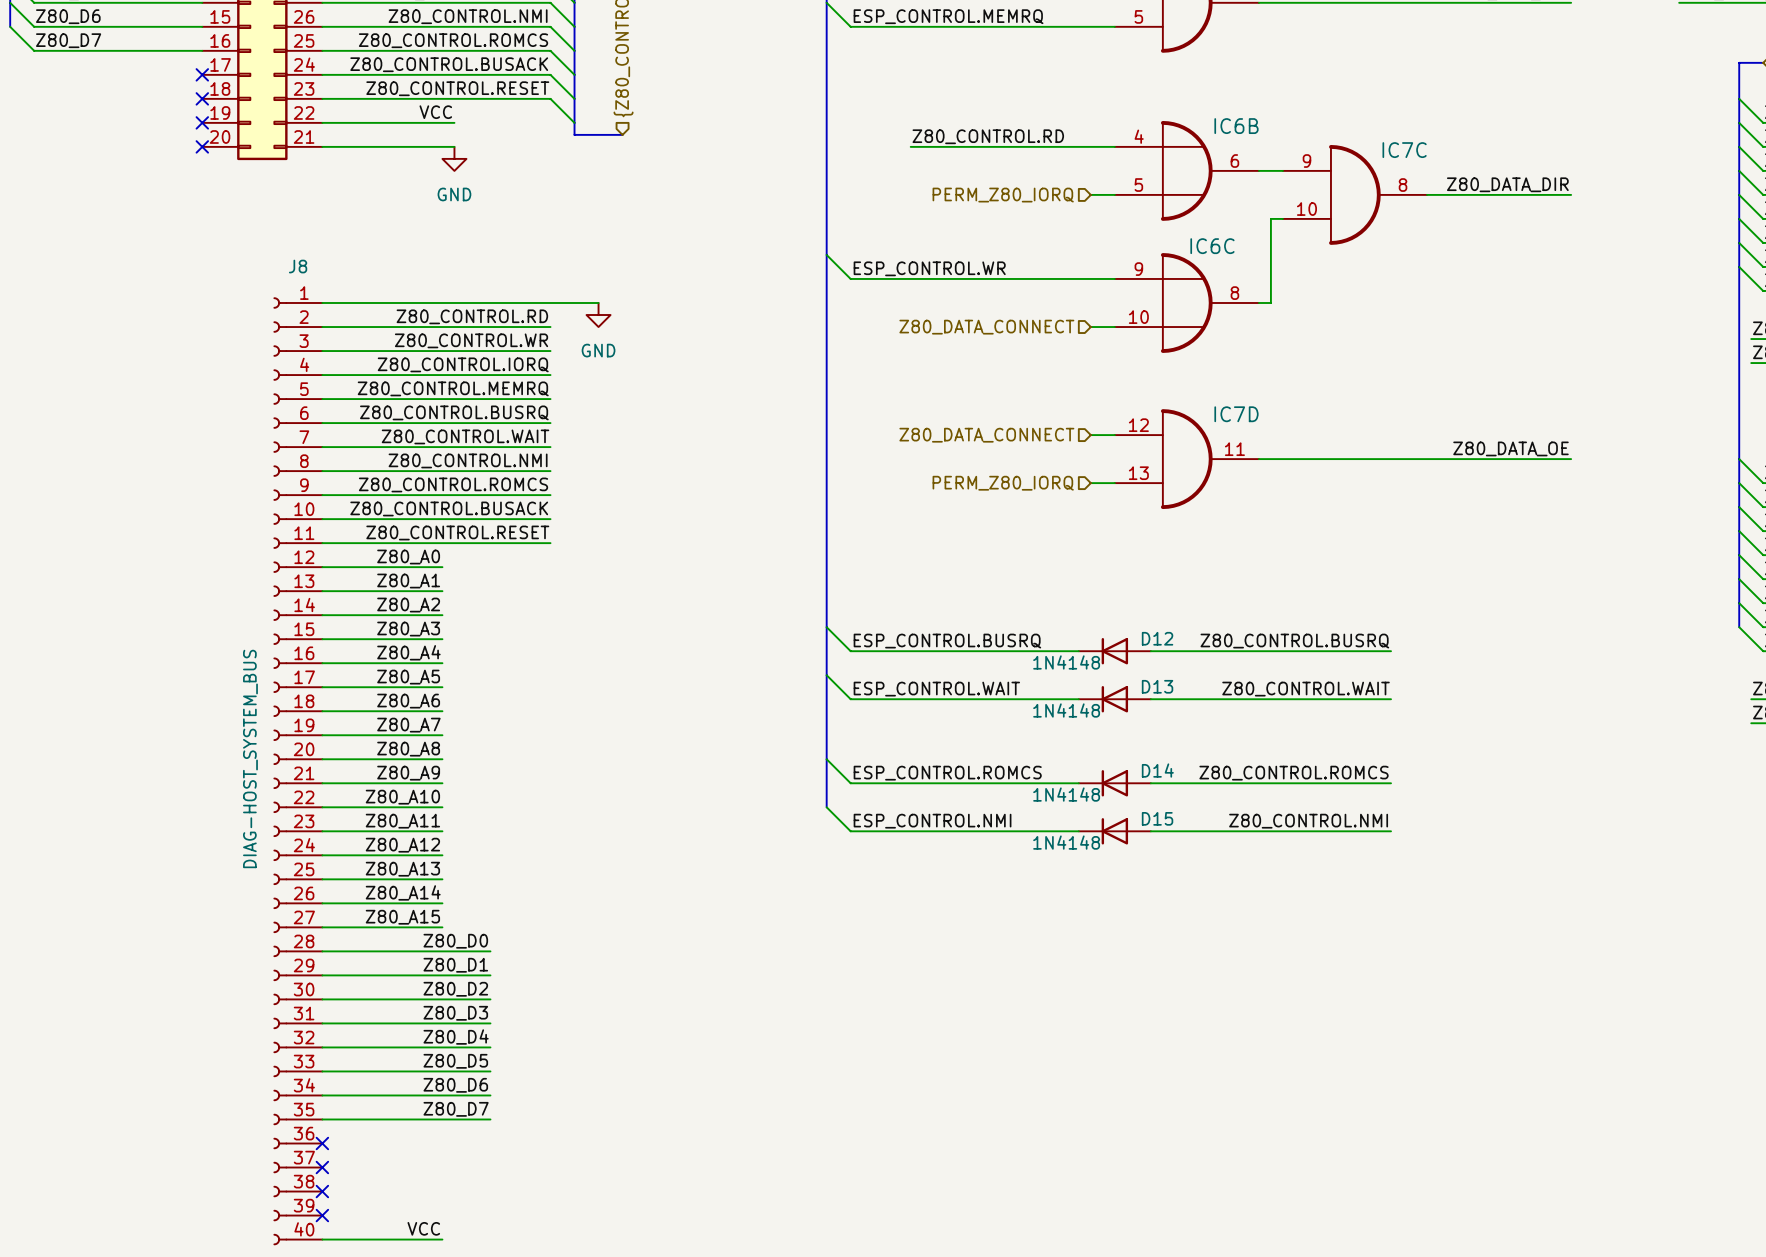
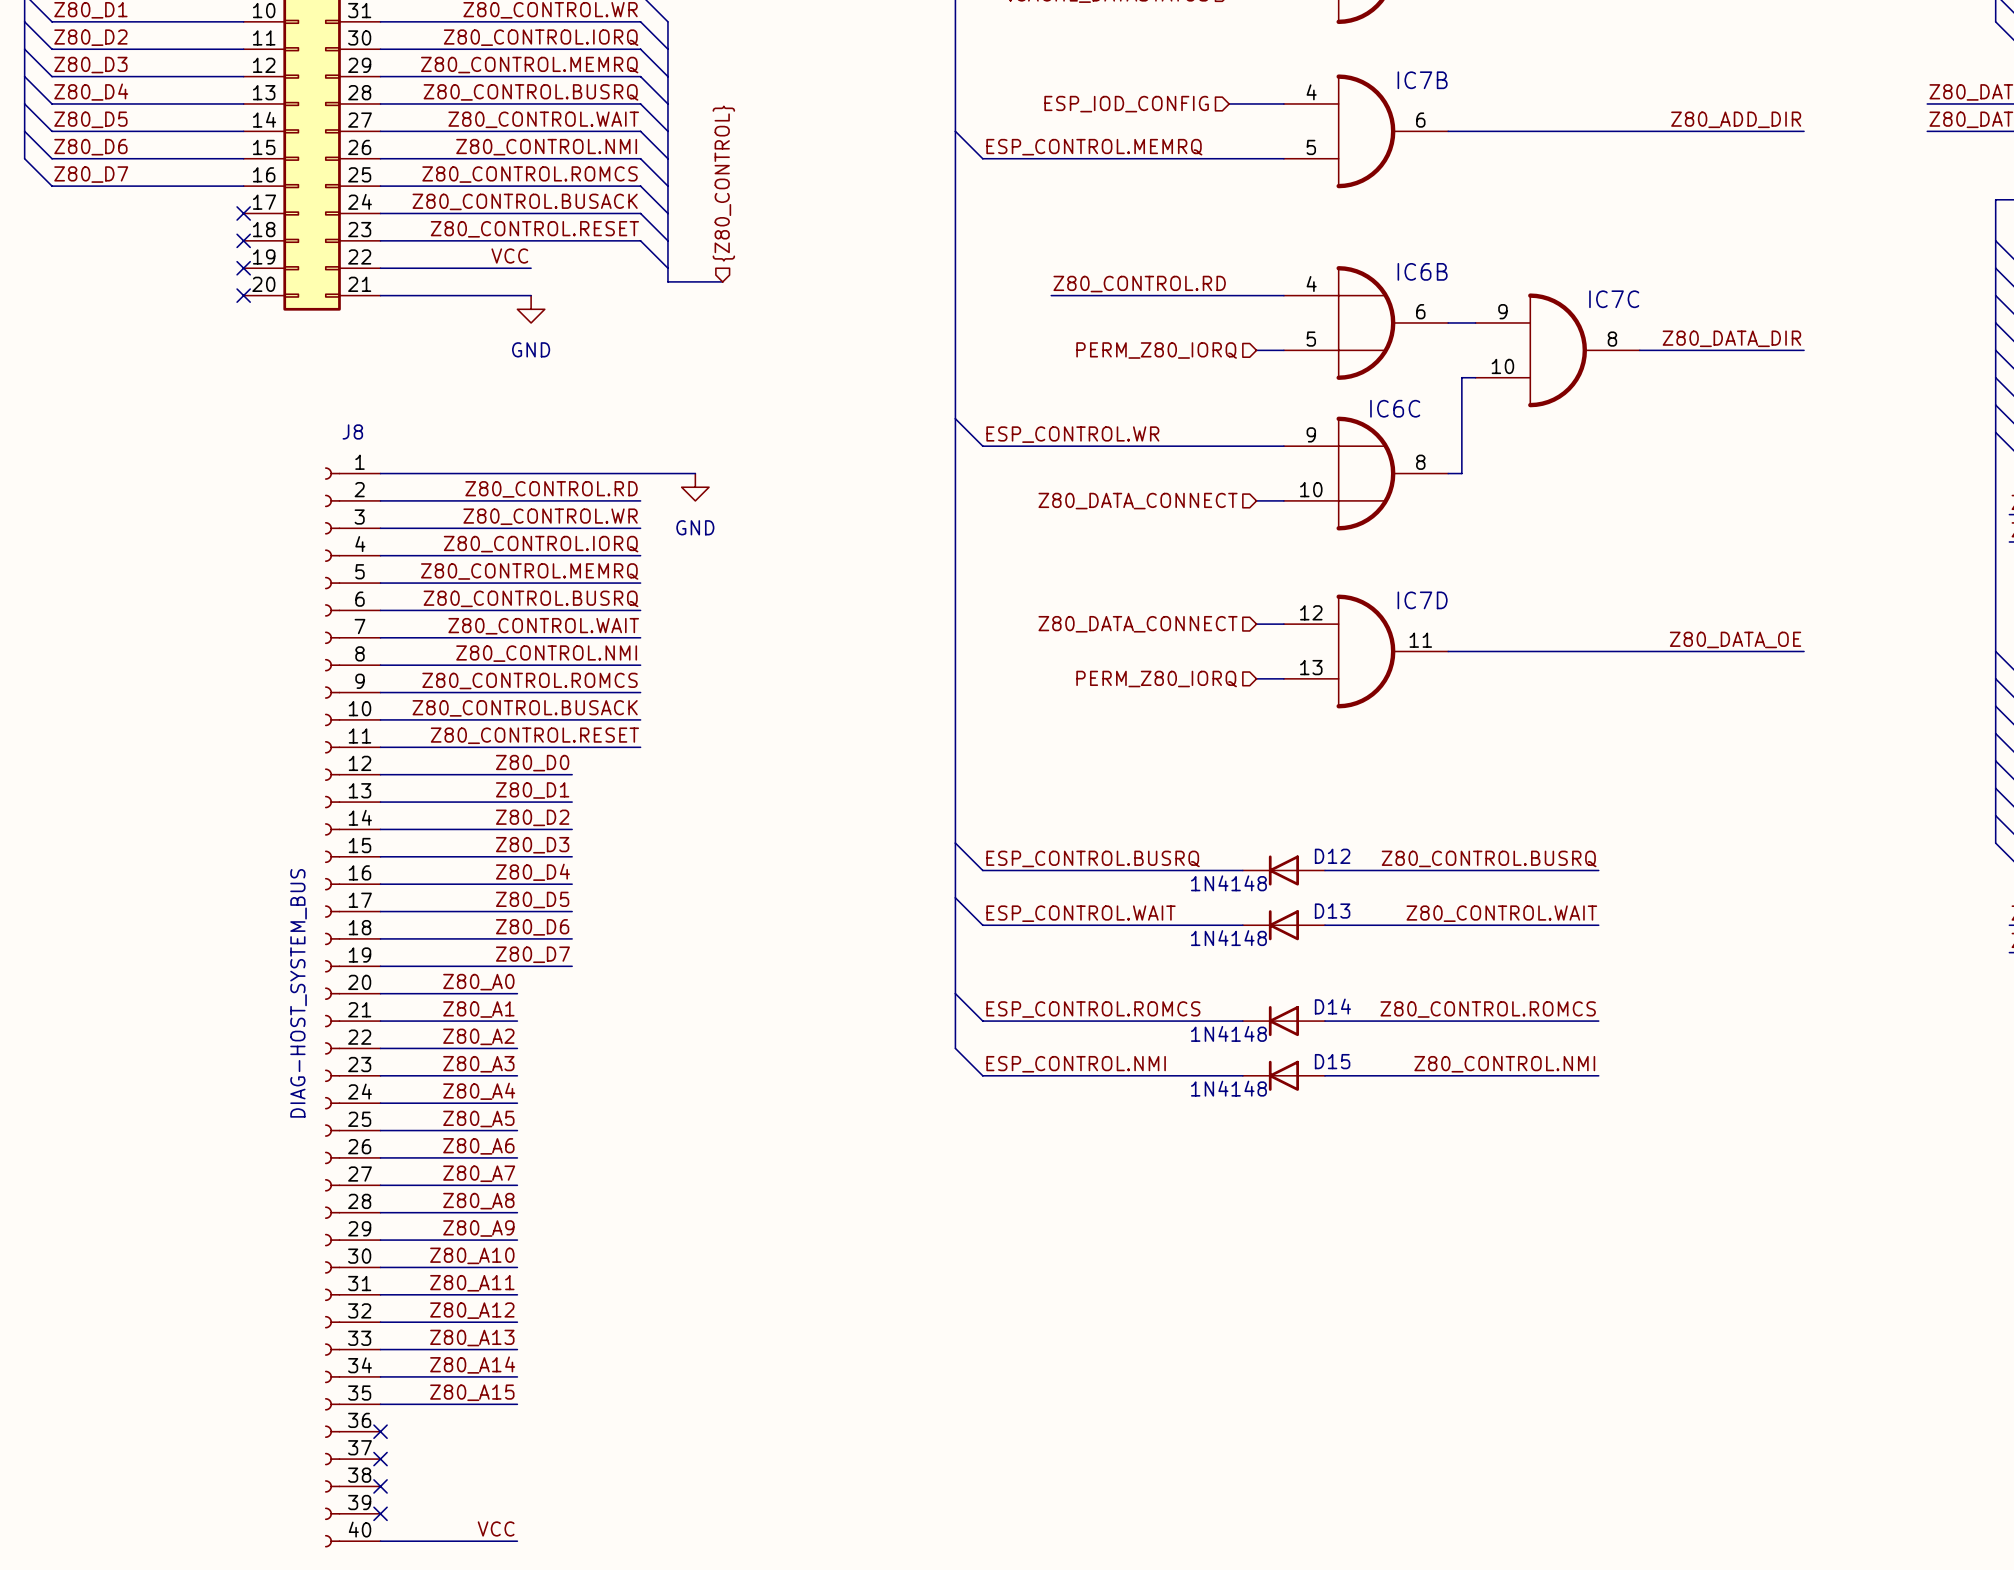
label: Z80_A0 (408, 557) -> none
label: none -> Z80_D0 (532, 763)
wire: none -> (517, 774) (572, 774)
label: Z80_A1 (408, 581) -> none
label: none -> Z80_D1 (532, 790)
wire: none -> (517, 802) (572, 802)
label: Z80_A2 (408, 605) -> none
label: none -> Z80_D2 (532, 817)
wire: none -> (517, 829) (572, 829)
label: Z80_A3 (408, 629) -> none
label: none -> Z80_D3 (532, 845)
wire: none -> (517, 856) (572, 856)
label: Z80_A4 (408, 652) -> none
label: none -> Z80_D4 (532, 872)
wire: none -> (517, 884) (572, 884)
label: Z80_A5 (408, 677) -> none
label: none -> Z80_D5 (532, 899)
wire: none -> (517, 911) (572, 911)
label: Z80_A6 (408, 701) -> none
label: none -> Z80_D6 (532, 927)
wire: none -> (517, 938) (572, 938)
label: Z80_A7 (408, 725) -> none
label: none -> Z80_D7 (532, 954)
label: Z80_A8 (408, 749) -> Z80_A0 (478, 982)
label: Z80_A9 (408, 773) -> Z80_A1 (478, 1009)
label: Z80_A10 (402, 797) -> Z80_A2 (478, 1036)
label: Z80_A11 (402, 821) -> Z80_A3 (478, 1064)
label: Z80_A12 (402, 845) -> Z80_A4 (479, 1091)
label: Z80_A13 (402, 869) -> Z80_A5 (478, 1119)
label: Z80_A14 (403, 892) -> Z80_A6 (478, 1146)
label: Z80_A15 (402, 917) -> Z80_A7 (479, 1173)
label: none -> Z80_A8 (478, 1201)
label: Z80_D0 (455, 941) -> none
wire: (442, 951) (490, 951) -> (517, 966) (572, 966)
label: none -> Z80_A9 (478, 1228)
label: Z80_D1 (455, 965) -> none
wire: (442, 975) (490, 975) -> none
label: none -> Z80_A10 (472, 1255)
label: Z80_D2 (455, 989) -> none
wire: (442, 999) (490, 999) -> none
label: none -> Z80_A11 (472, 1283)
label: Z80_D3 (455, 1013) -> none
wire: (442, 1023) (490, 1023) -> none
label: none -> Z80_A12 (472, 1310)
label: Z80_D4 (456, 1037) -> none
wire: (442, 1047) (490, 1047) -> none
label: none -> Z80_A13 (472, 1338)
label: Z80_D5 (455, 1061) -> none
wire: (442, 1071) (490, 1071) -> none
label: none -> Z80_A14 (472, 1365)
label: Z80_D6 (455, 1085) -> none
wire: (442, 1095) (490, 1095) -> none
label: none -> Z80_A15 (472, 1392)
label: Z80_D7 (456, 1109) -> none
wire: (442, 1119) (490, 1119) -> none

